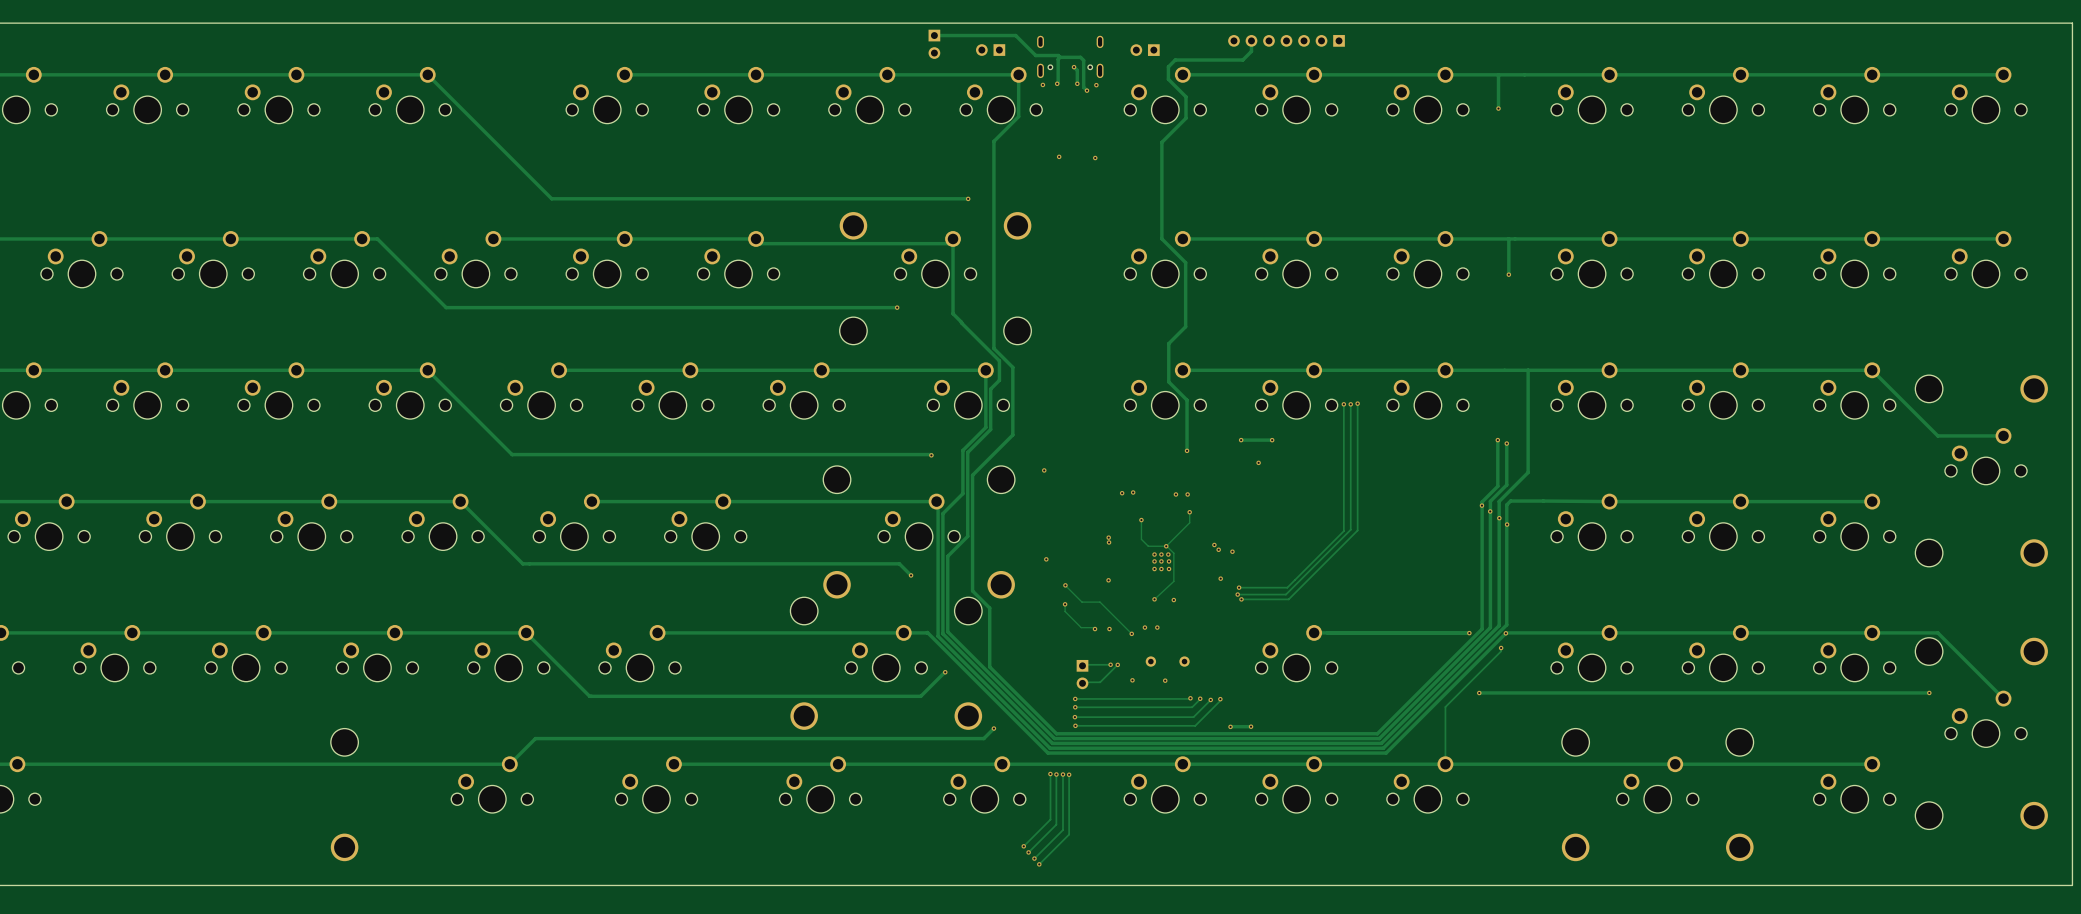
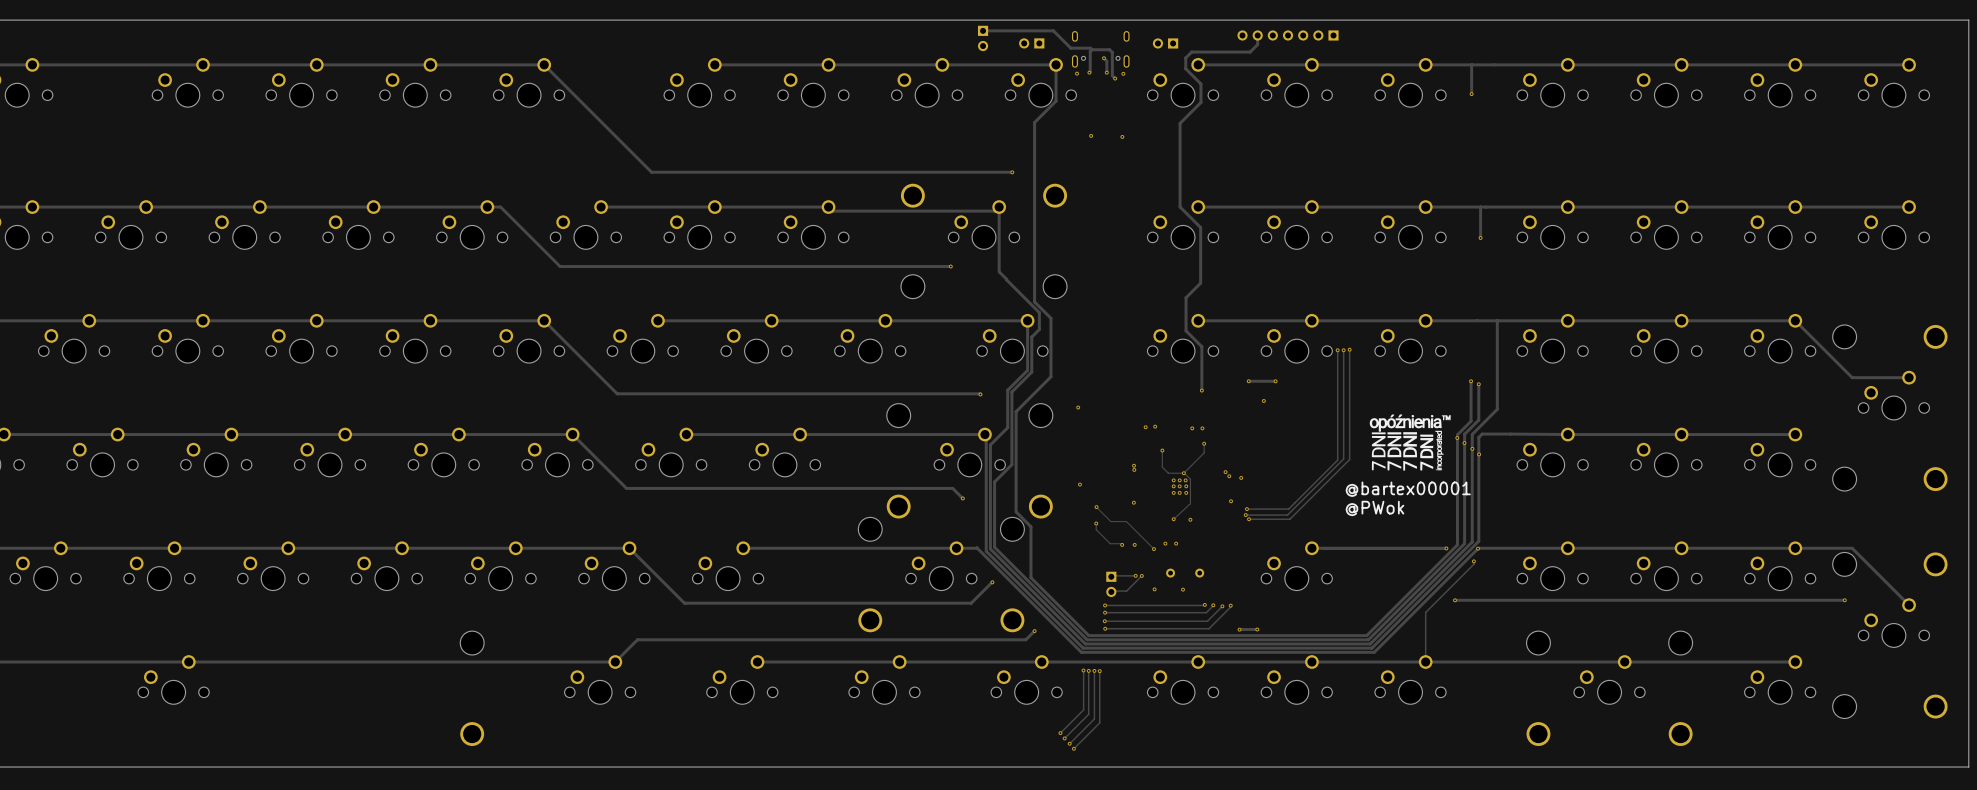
drawing: none -> [1369, 414, 1451, 471]
text: none -> @bartex00001 (1408, 489)
text: none -> @PWok (1374, 508)

